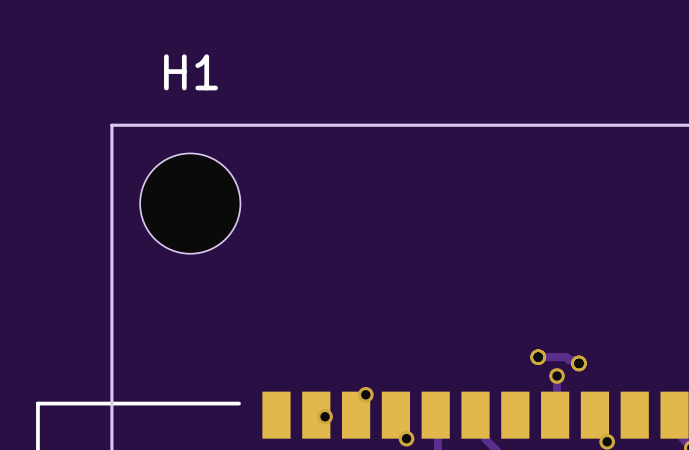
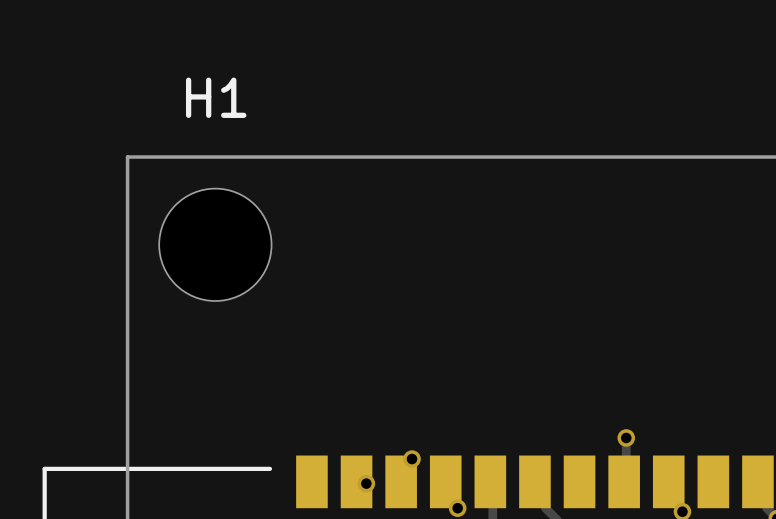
track: (538, 357) (566, 357) (578, 363) -> none
via: (538, 357) -> none
via: (578, 363) -> none

